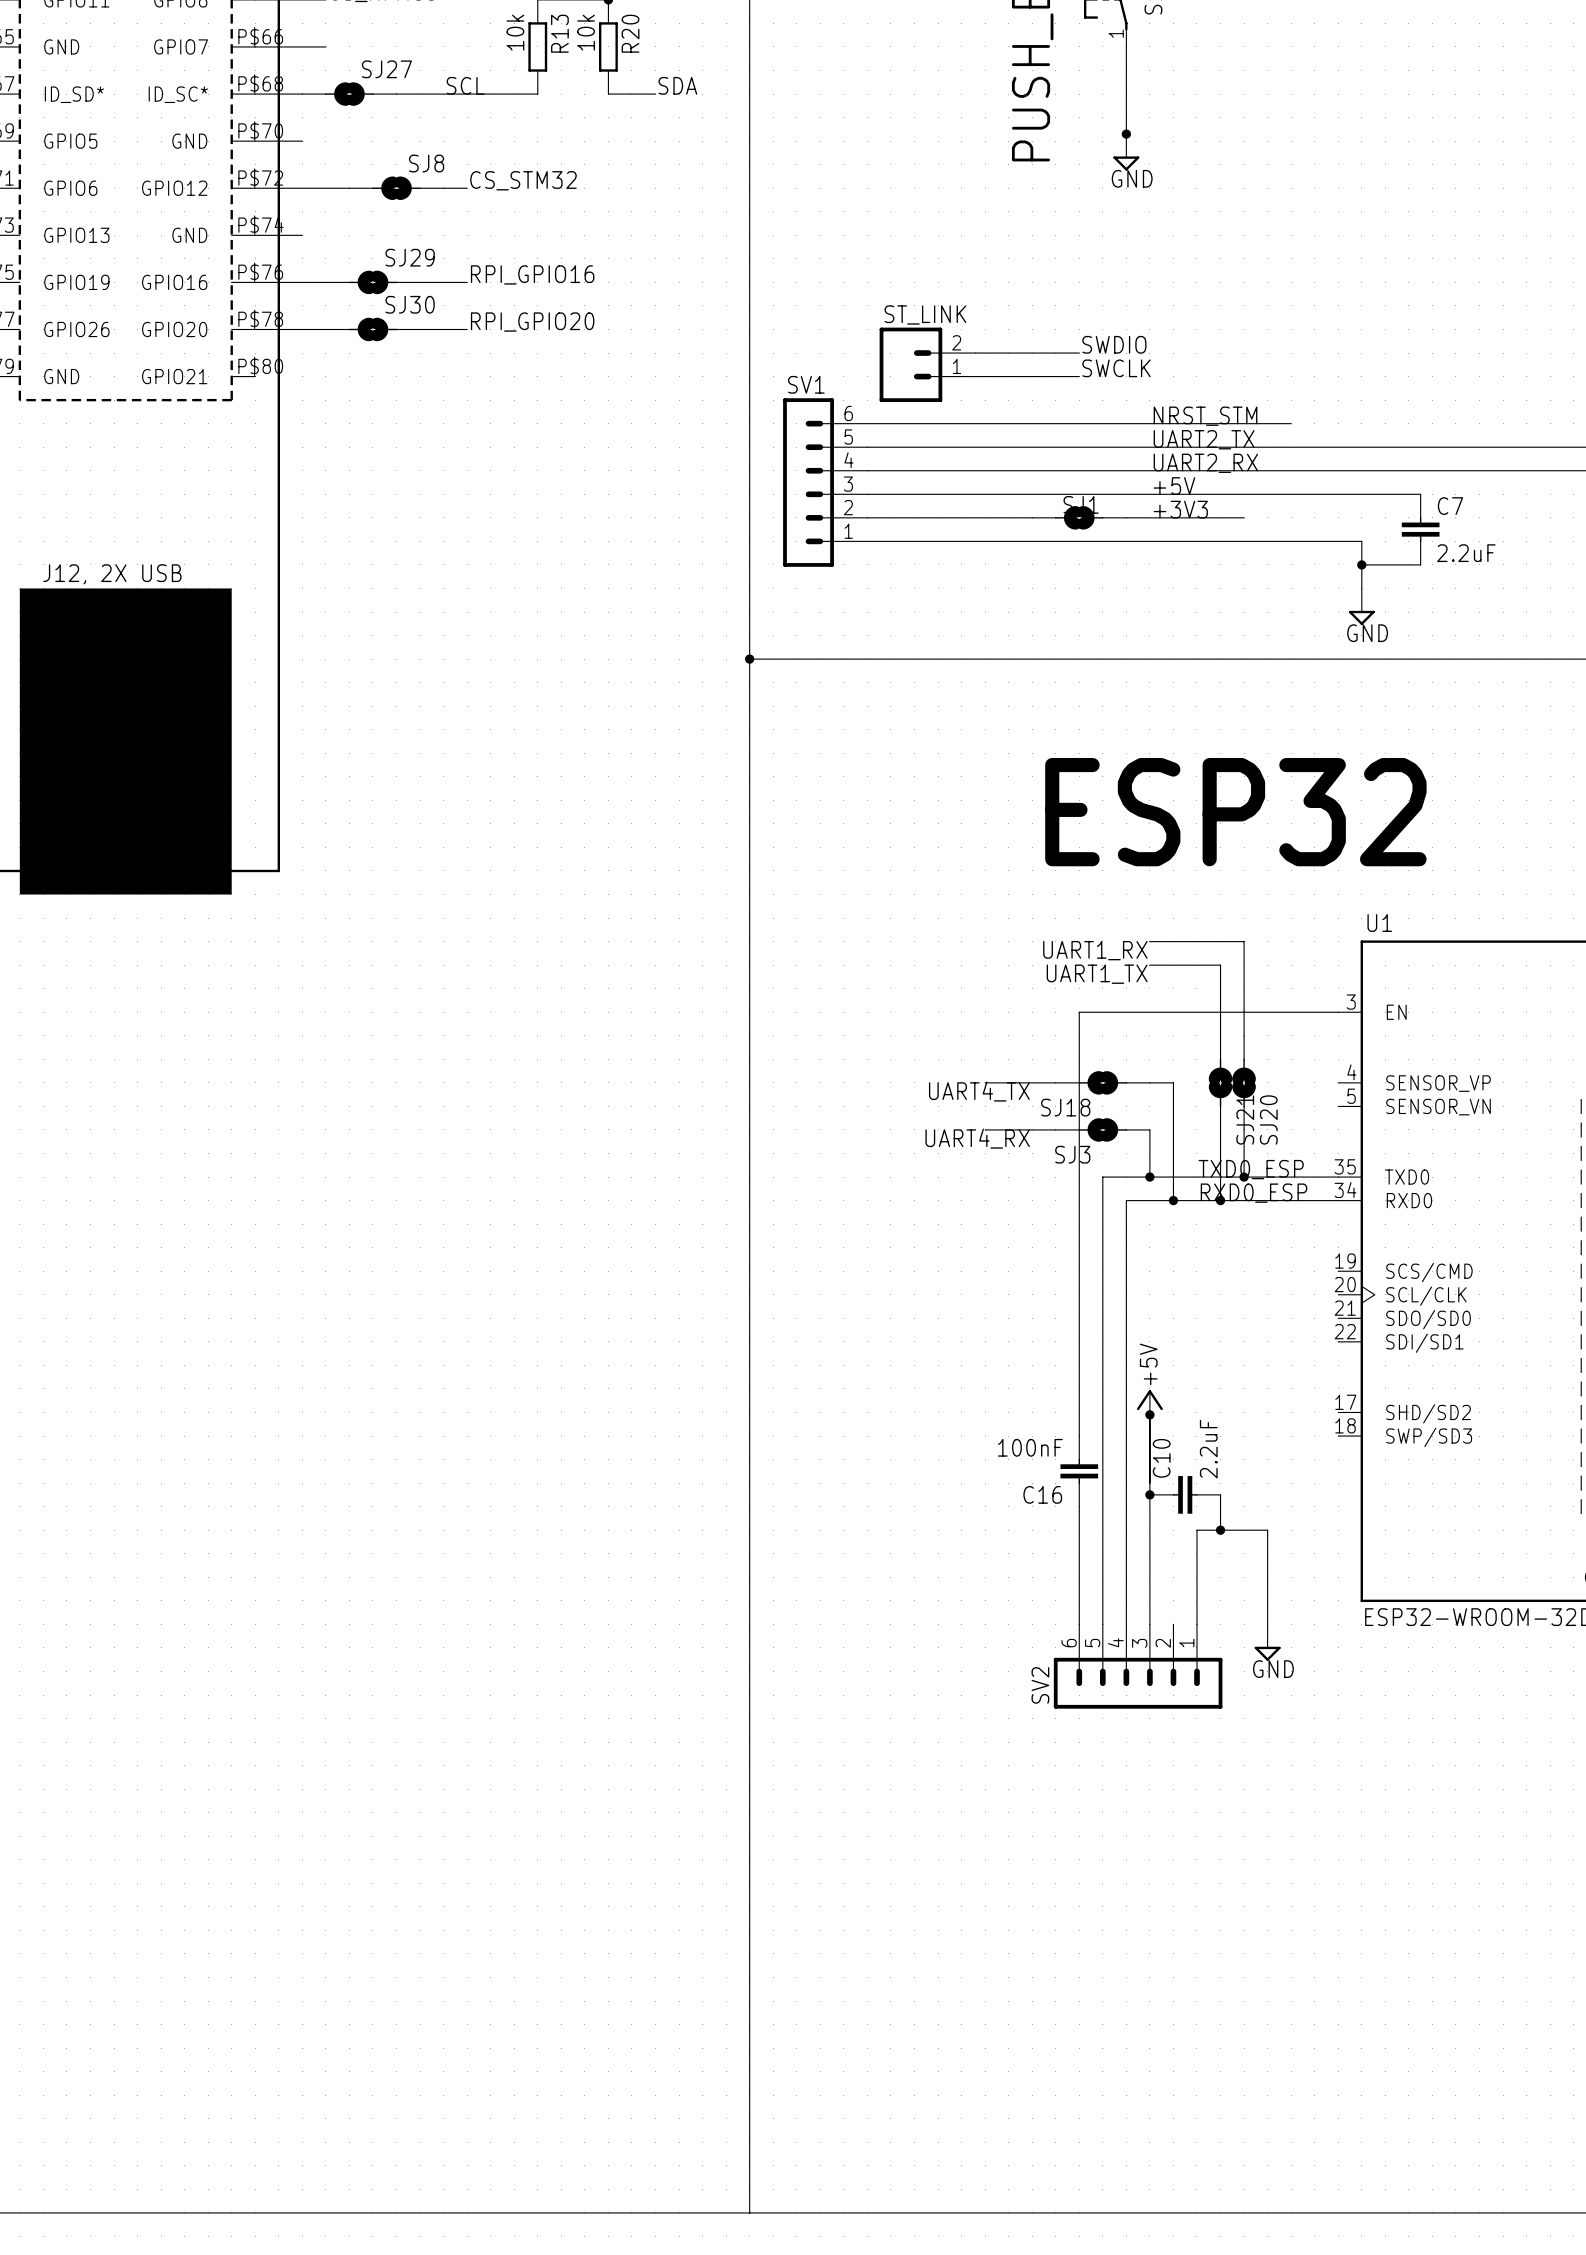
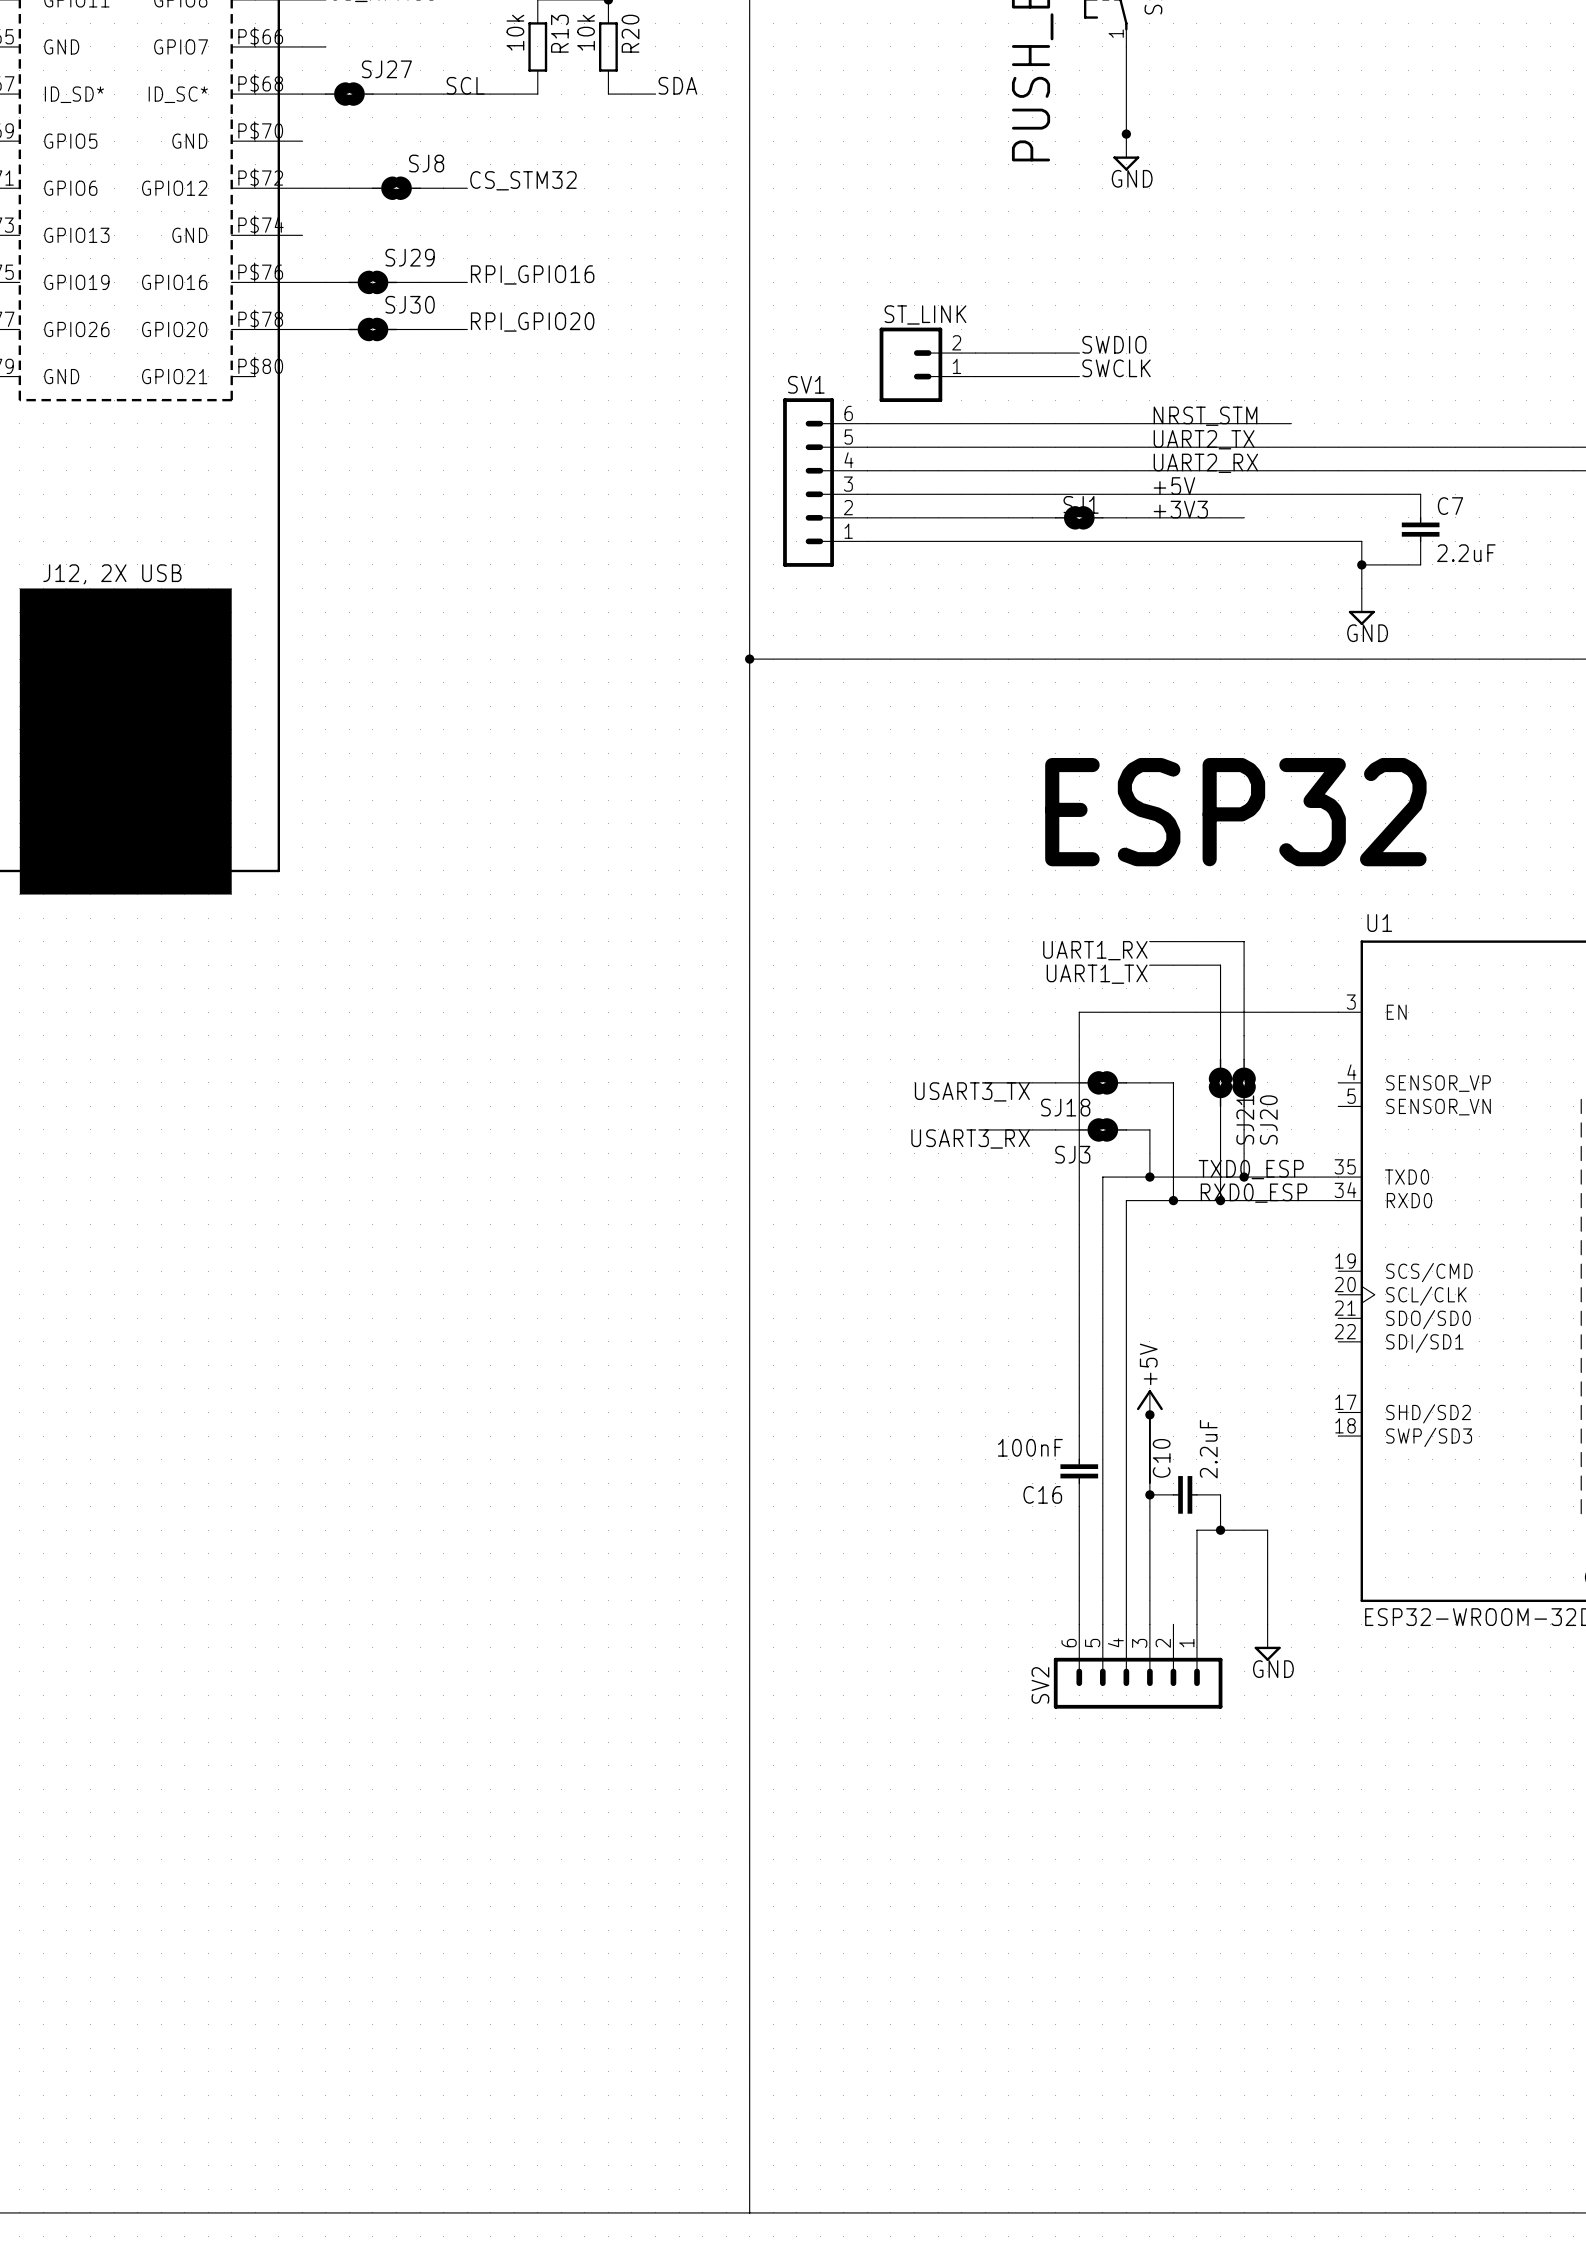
label: UART4_TX (979, 1091) -> USART3_TX (972, 1091)
label: UART4_RX (977, 1138) -> USART3_RX (970, 1138)

